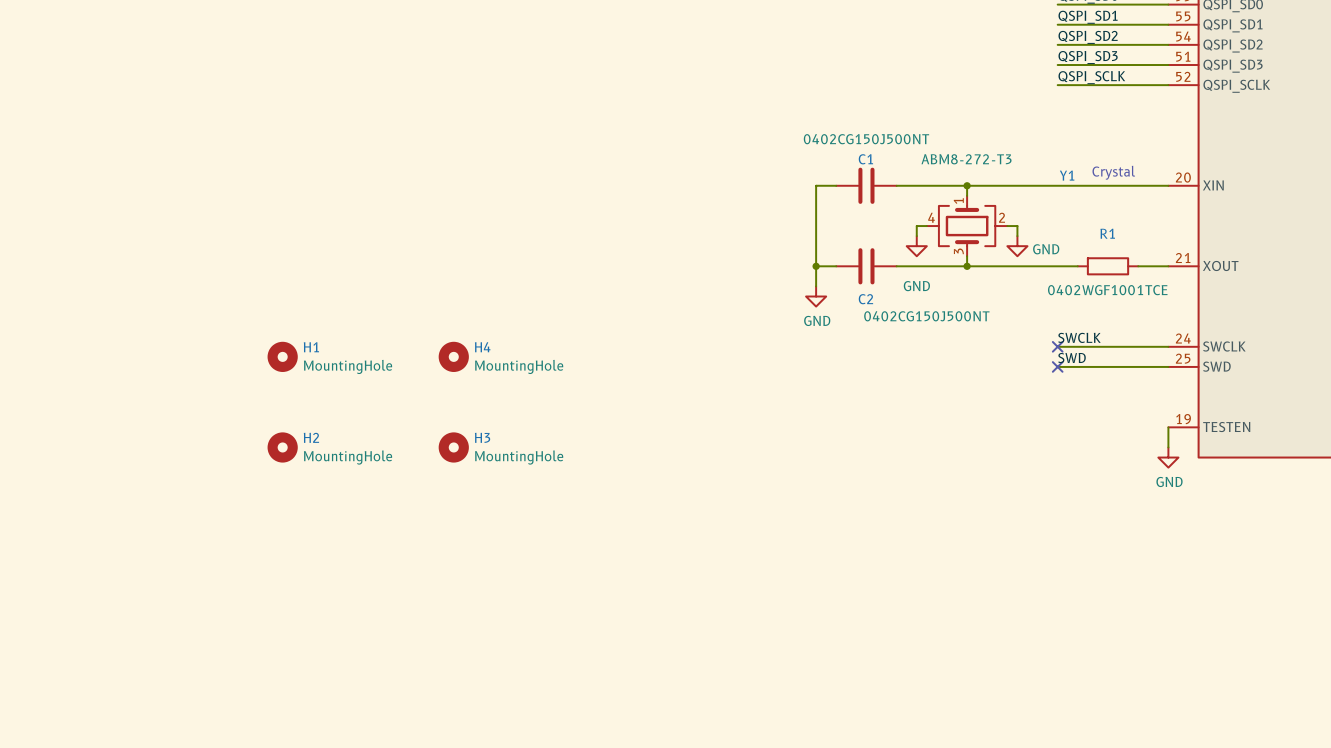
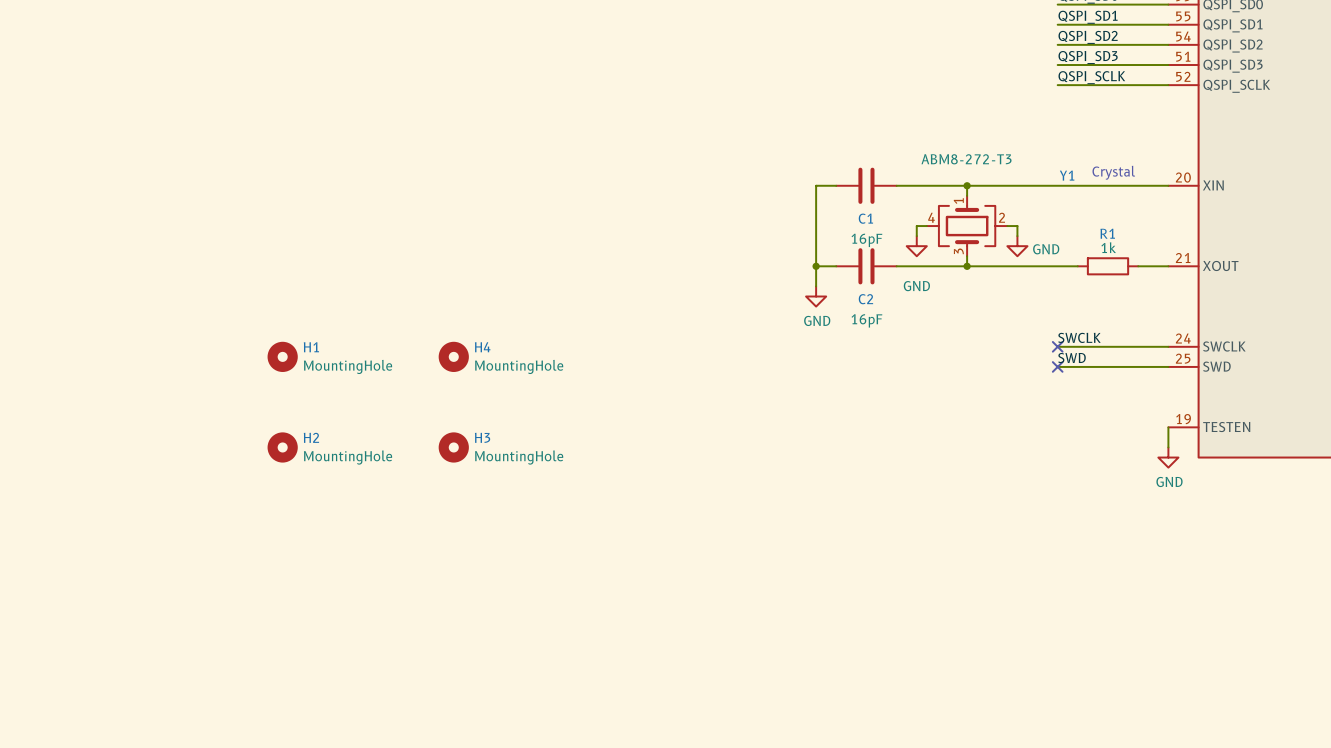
C1 value: 0402CG150J500NT (866, 139) -> 16pF (866, 240)
C1 name position: C1 (865, 159) -> C1 (865, 218)
R1 value: 0402WGF1001TCE (1107, 290) -> 1k (1108, 247)
C2 value: 0402CG150J500NT (926, 316) -> 16pF (866, 320)

